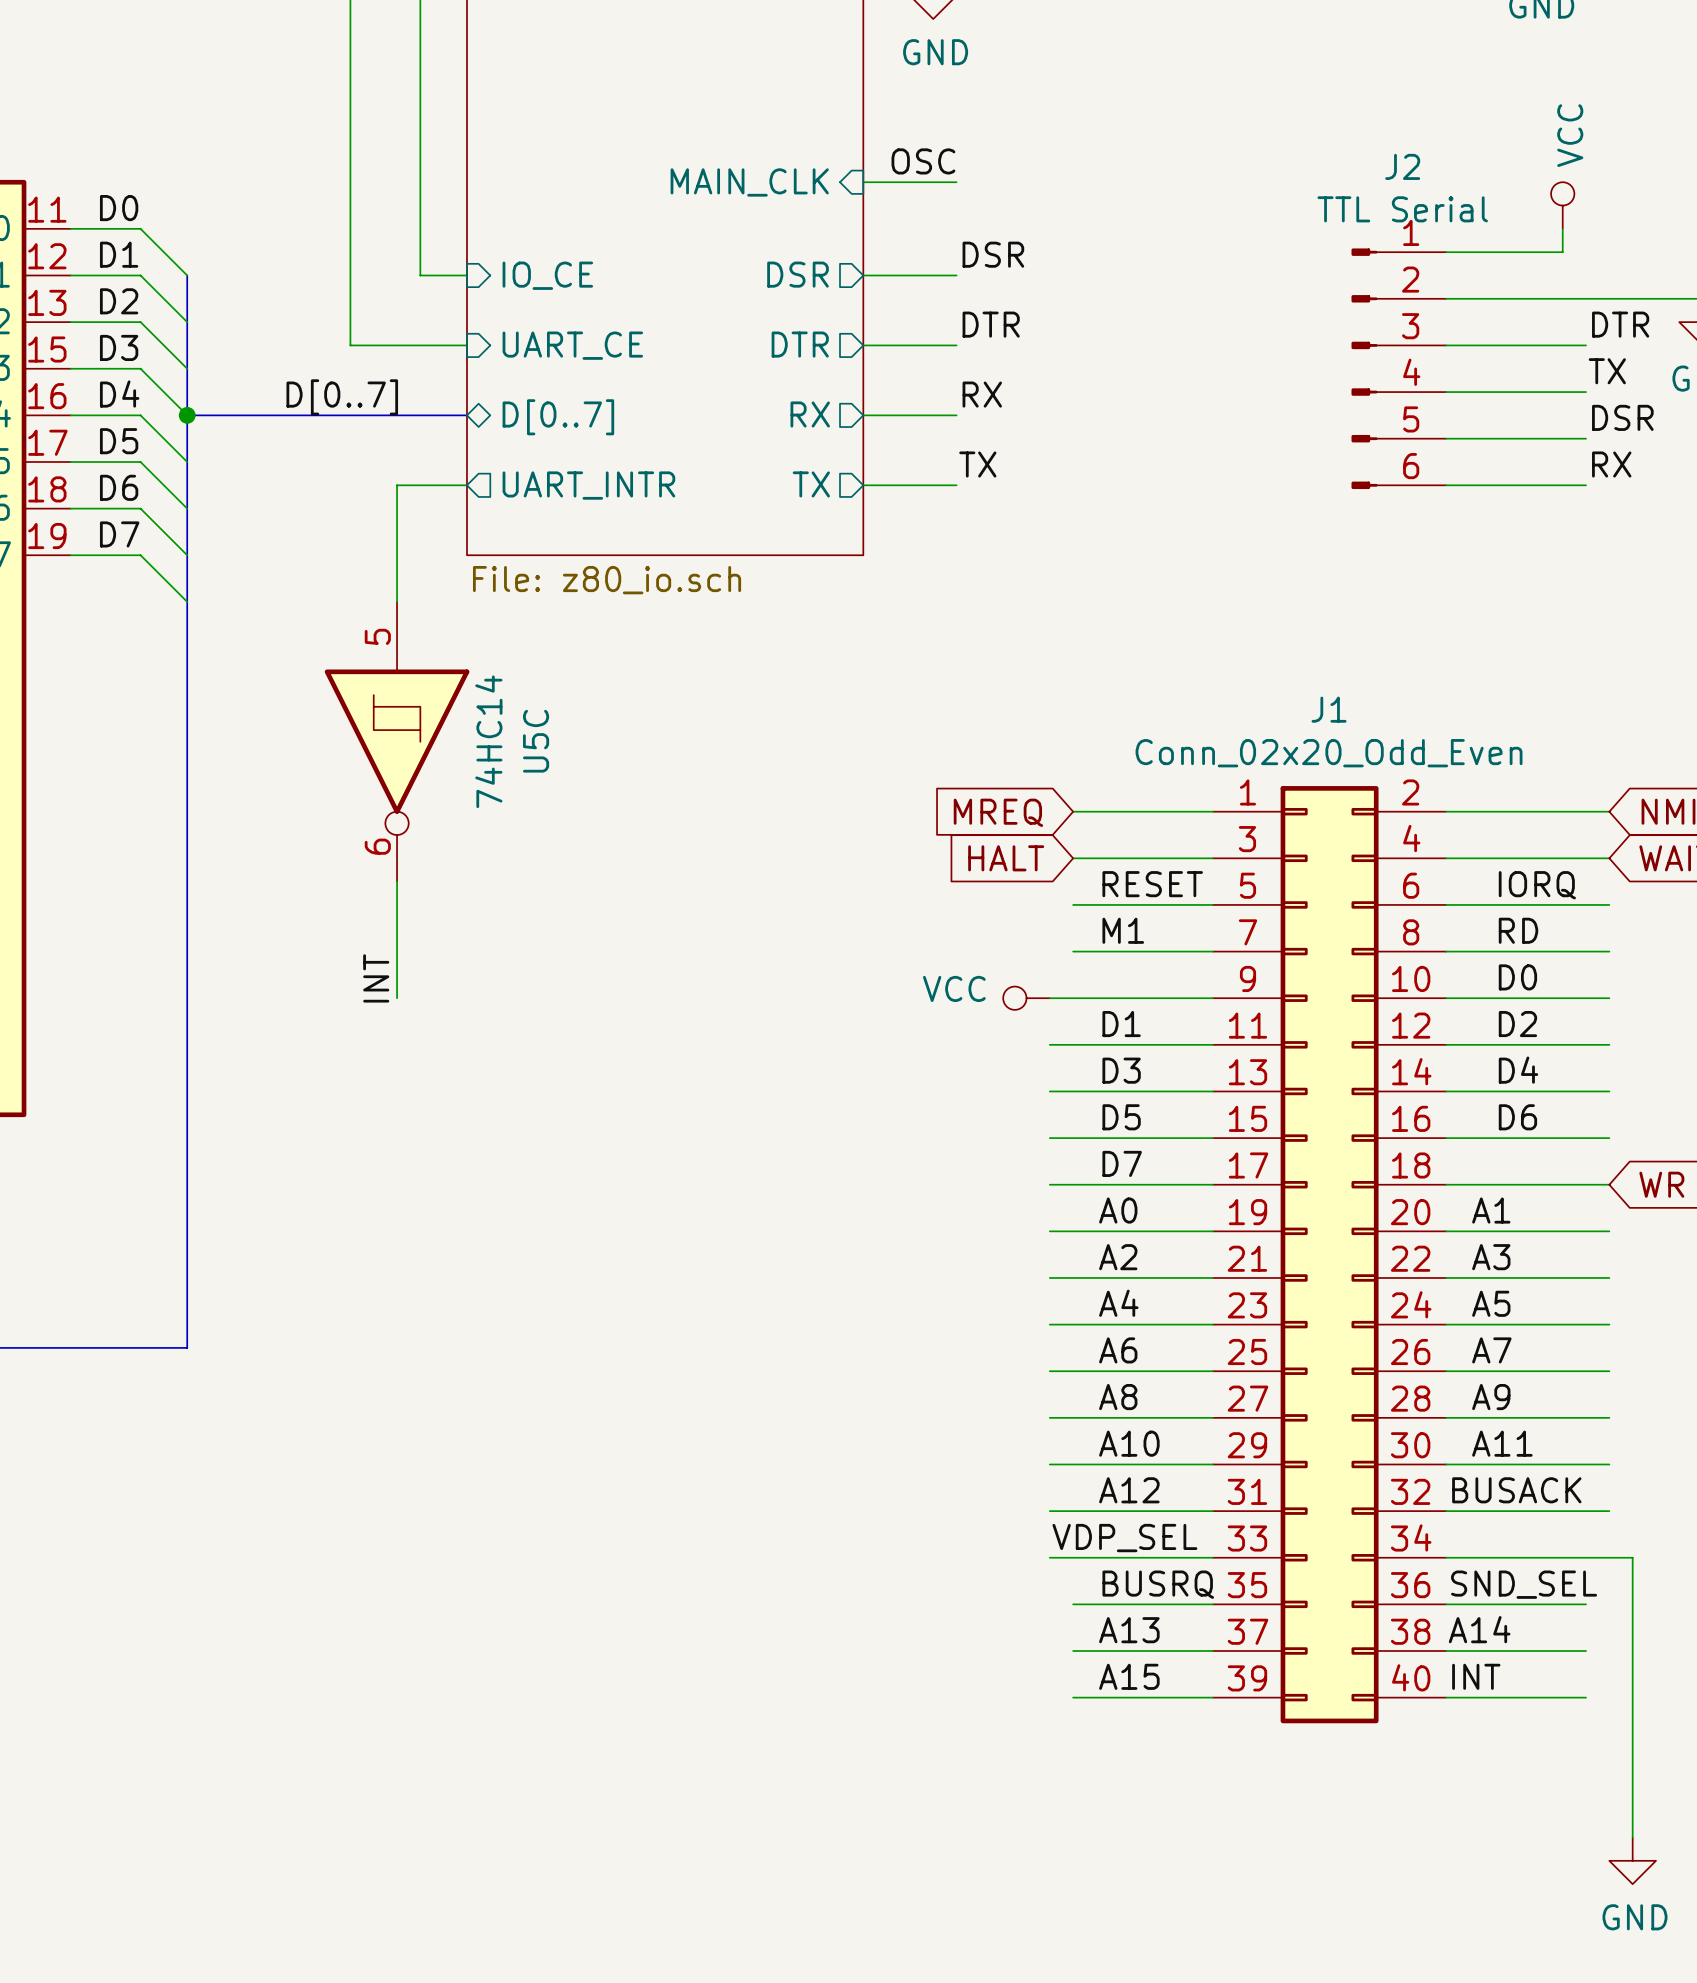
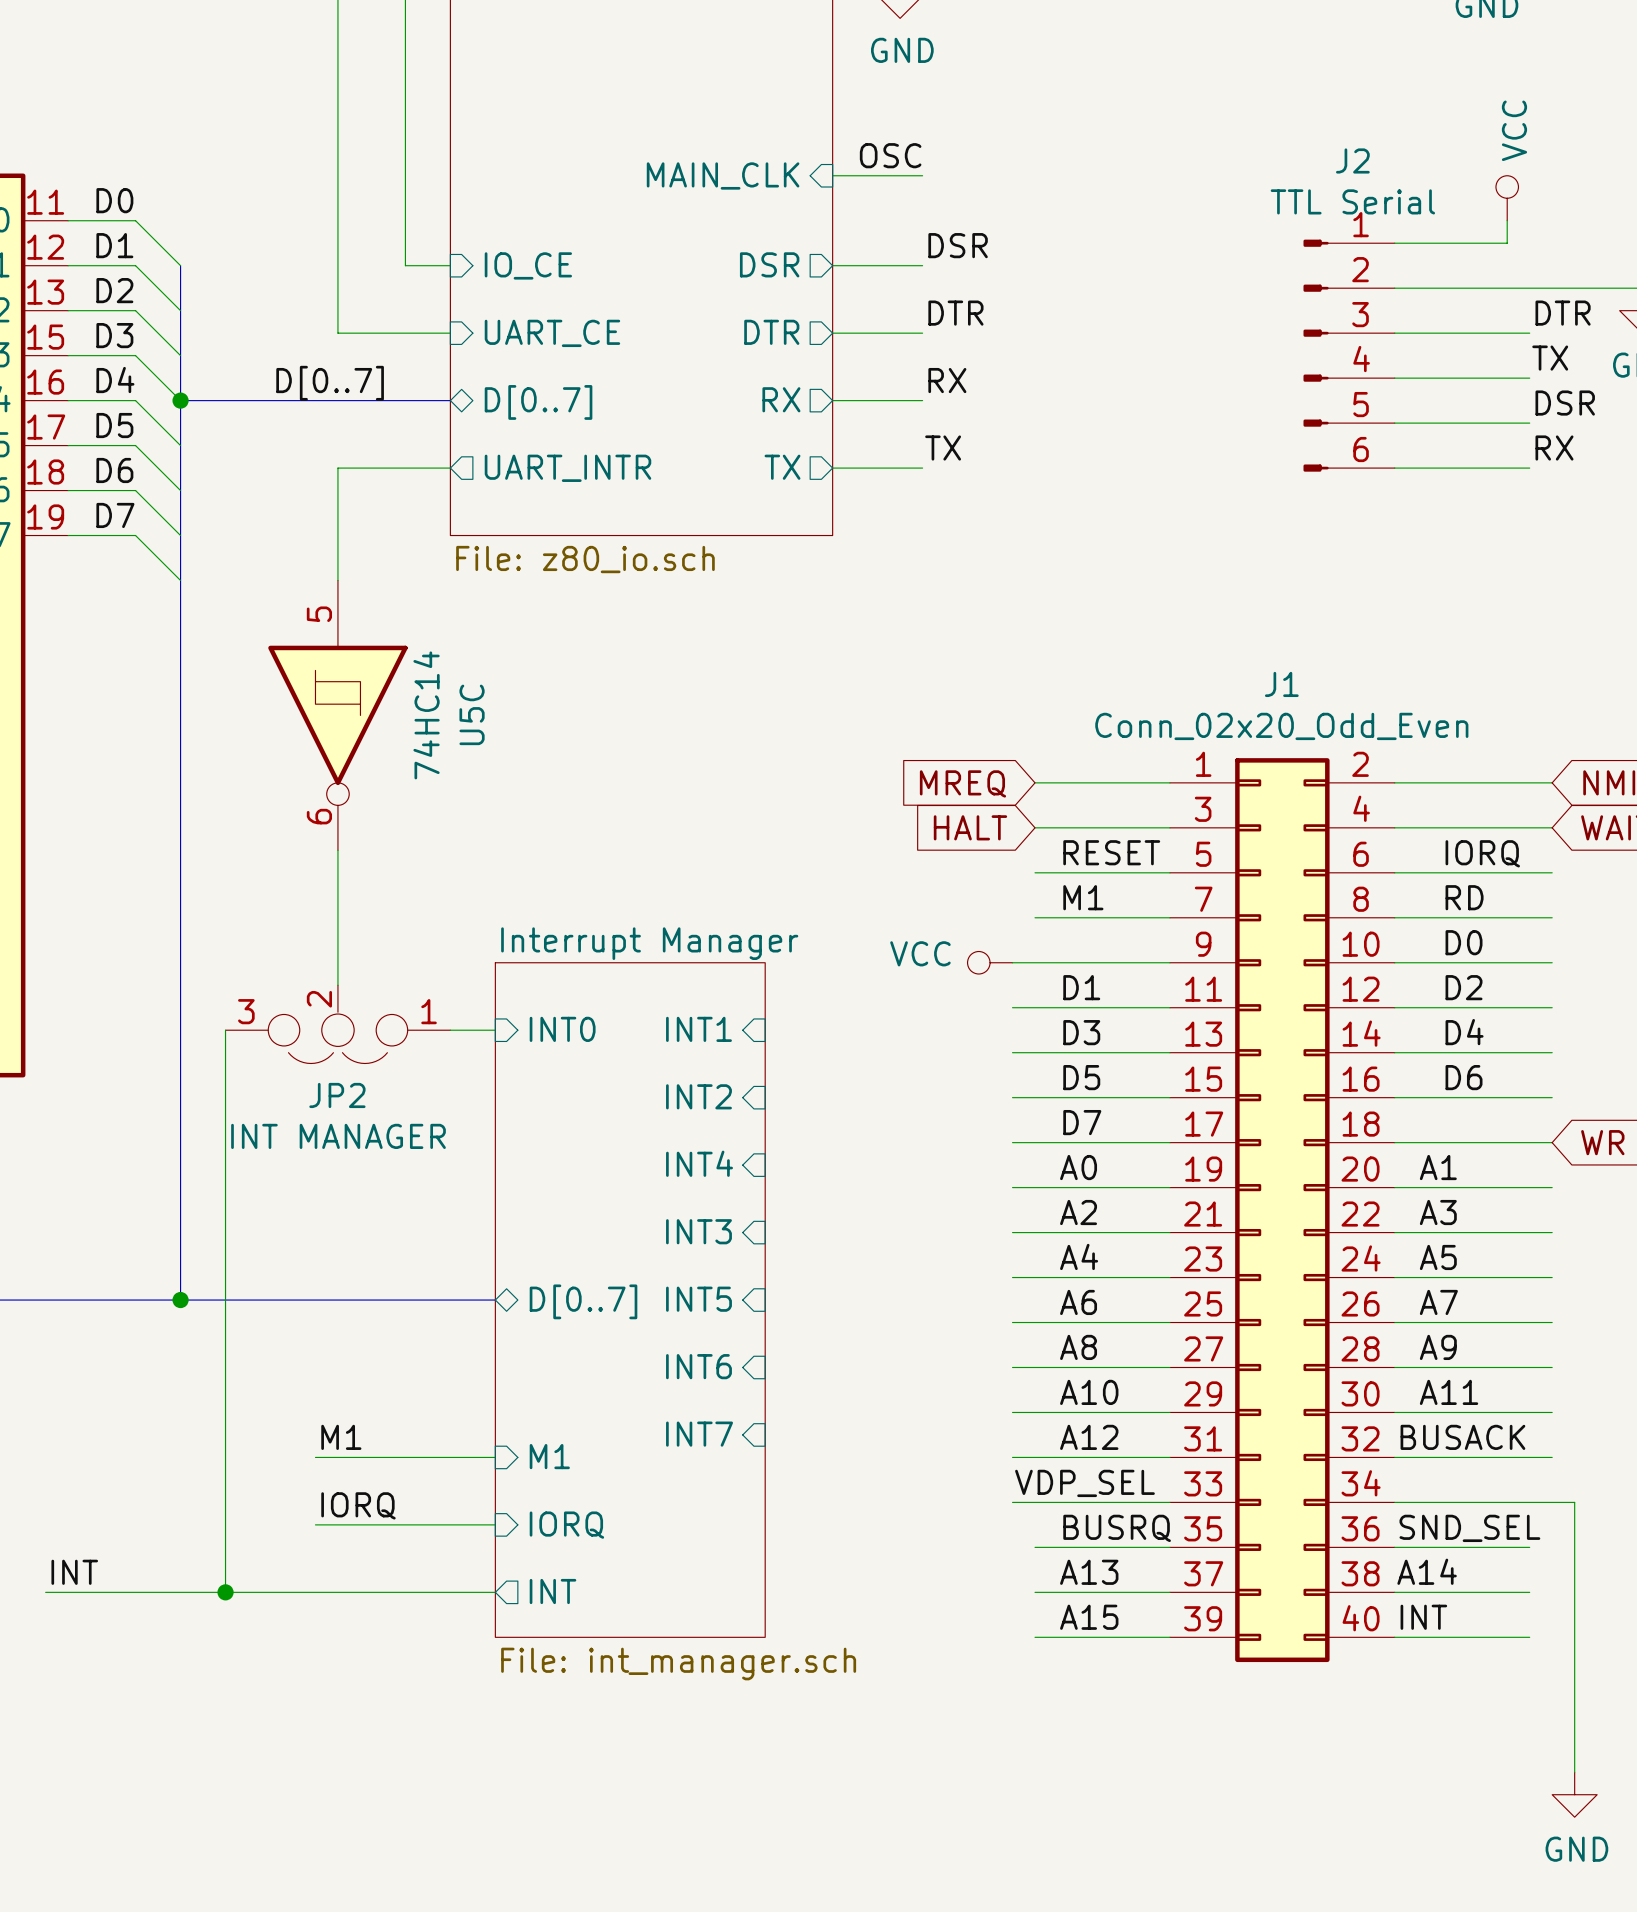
wire: (397, 485) (397, 601) -> (382, 468) (337, 468) (337, 580)
U5C position: (397, 741) -> (337, 715)
wire: none -> (337, 850) (337, 985)
wire: (397, 881) (397, 998) -> none
label: INT (376, 978) -> none
JP2: none -> INT MANAGER (337, 1024)
sheet pin: none -> INT0 (562, 1029)
sheet pin: none -> INT1 (698, 1029)
wire: none -> (225, 1030) (225, 1592)
wire: none -> (450, 1030) (495, 1030)
sheet pin: none -> INT2 (698, 1096)
sheet pin: none -> INT4 (699, 1163)
sheet pin: none -> INT3 (698, 1231)
bus: none -> (180, 1300) (495, 1300)
junction: none -> (180, 1300)
sheet Interrupt Manager: none -> File: int_manager.sch (630, 1300)
sheet pin: none -> INT5 (698, 1299)
sheet pin: none -> D[0..7] (583, 1301)
sheet pin: none -> INT6 (698, 1366)
sheet pin: none -> INT7 (699, 1434)
label: none -> M1 (341, 1437)
sheet pin: none -> M1 (549, 1456)
wire: none -> (315, 1457) (495, 1457)
label: none -> IORQ (358, 1505)
wire: none -> (315, 1524) (495, 1524)
sheet pin: none -> IORQ (566, 1525)
label: none -> INT (74, 1572)
wire: none -> (45, 1592) (495, 1592)
junction: none -> (225, 1592)
sheet pin: none -> INT (553, 1591)

